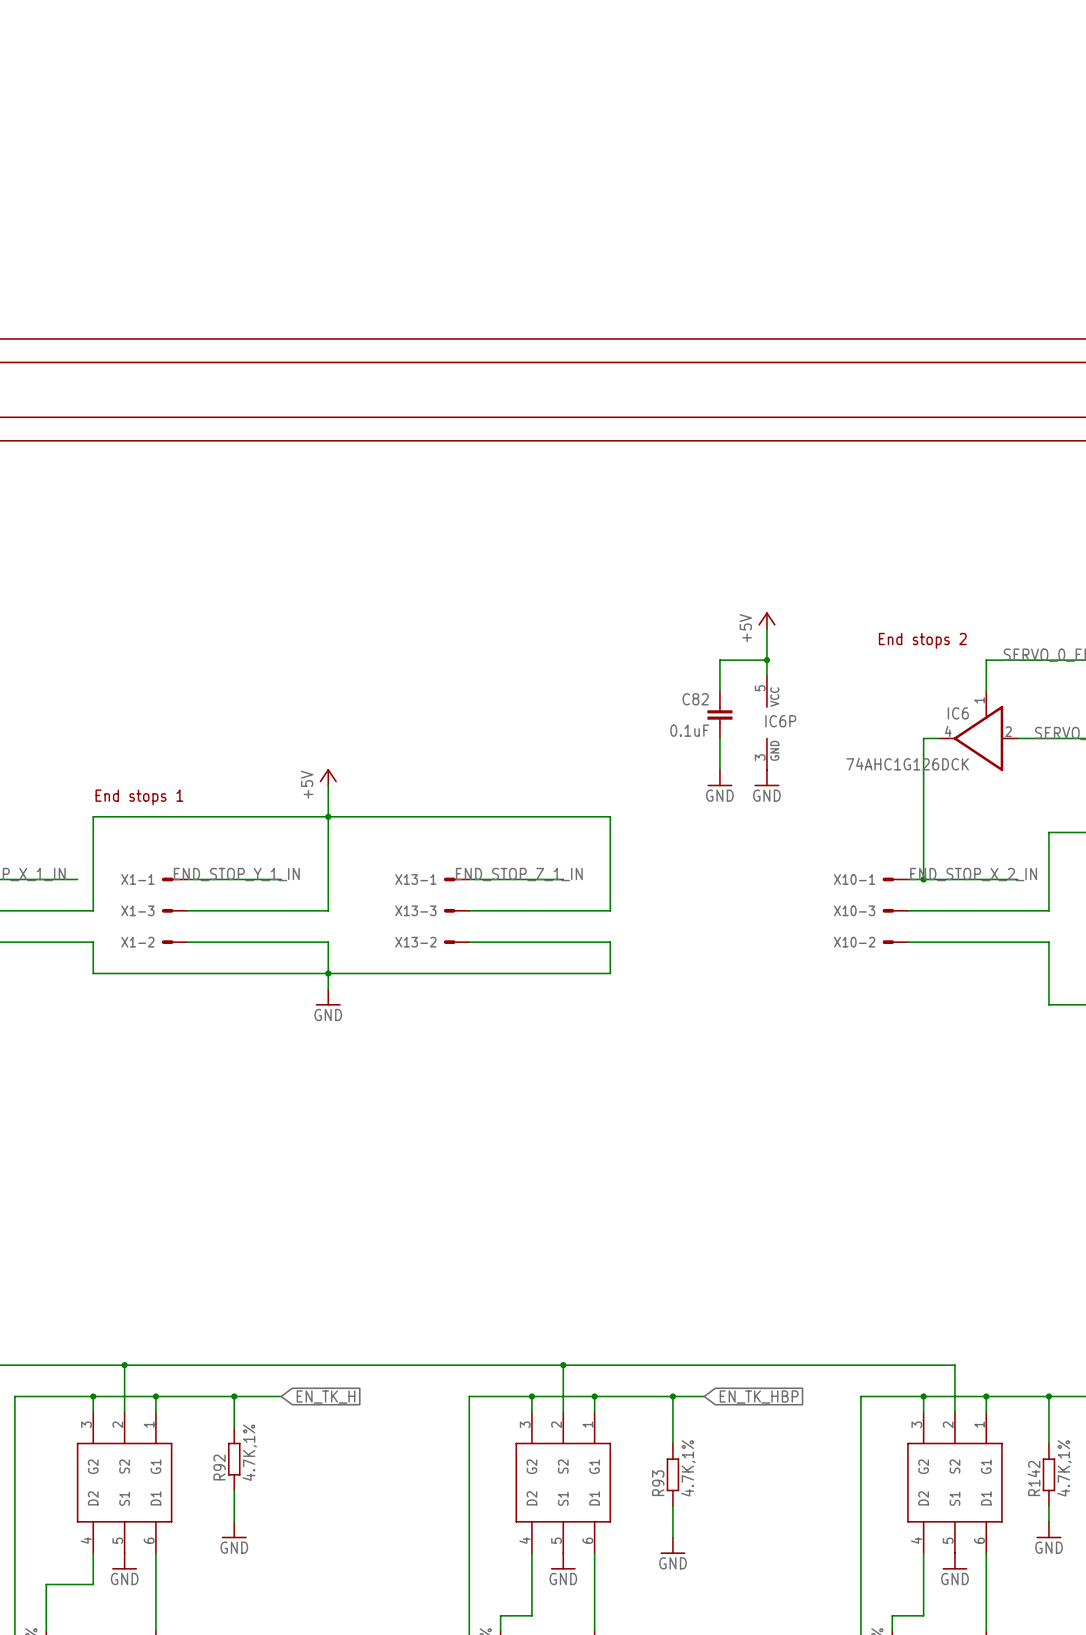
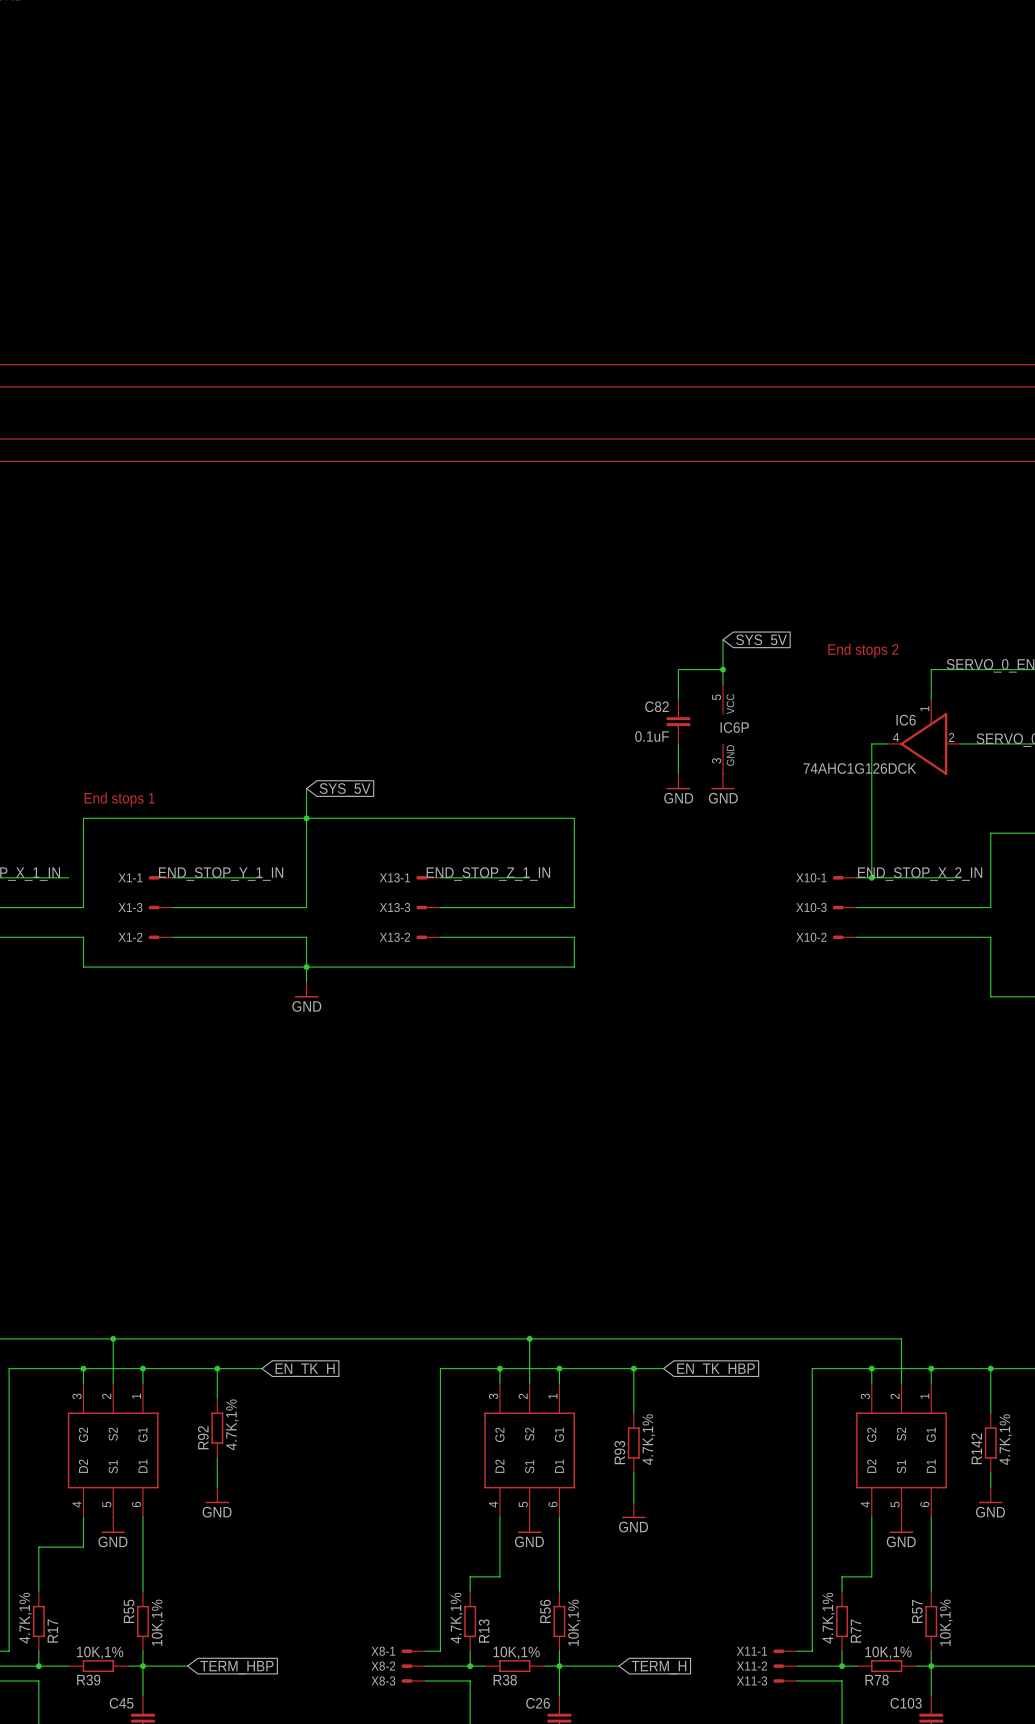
power symbol: +5V (766, 620) -> none
global label: none -> SYS_5V (761, 641)
power symbol: +5V (328, 777) -> none
global label: none -> SYS_5V (345, 790)

